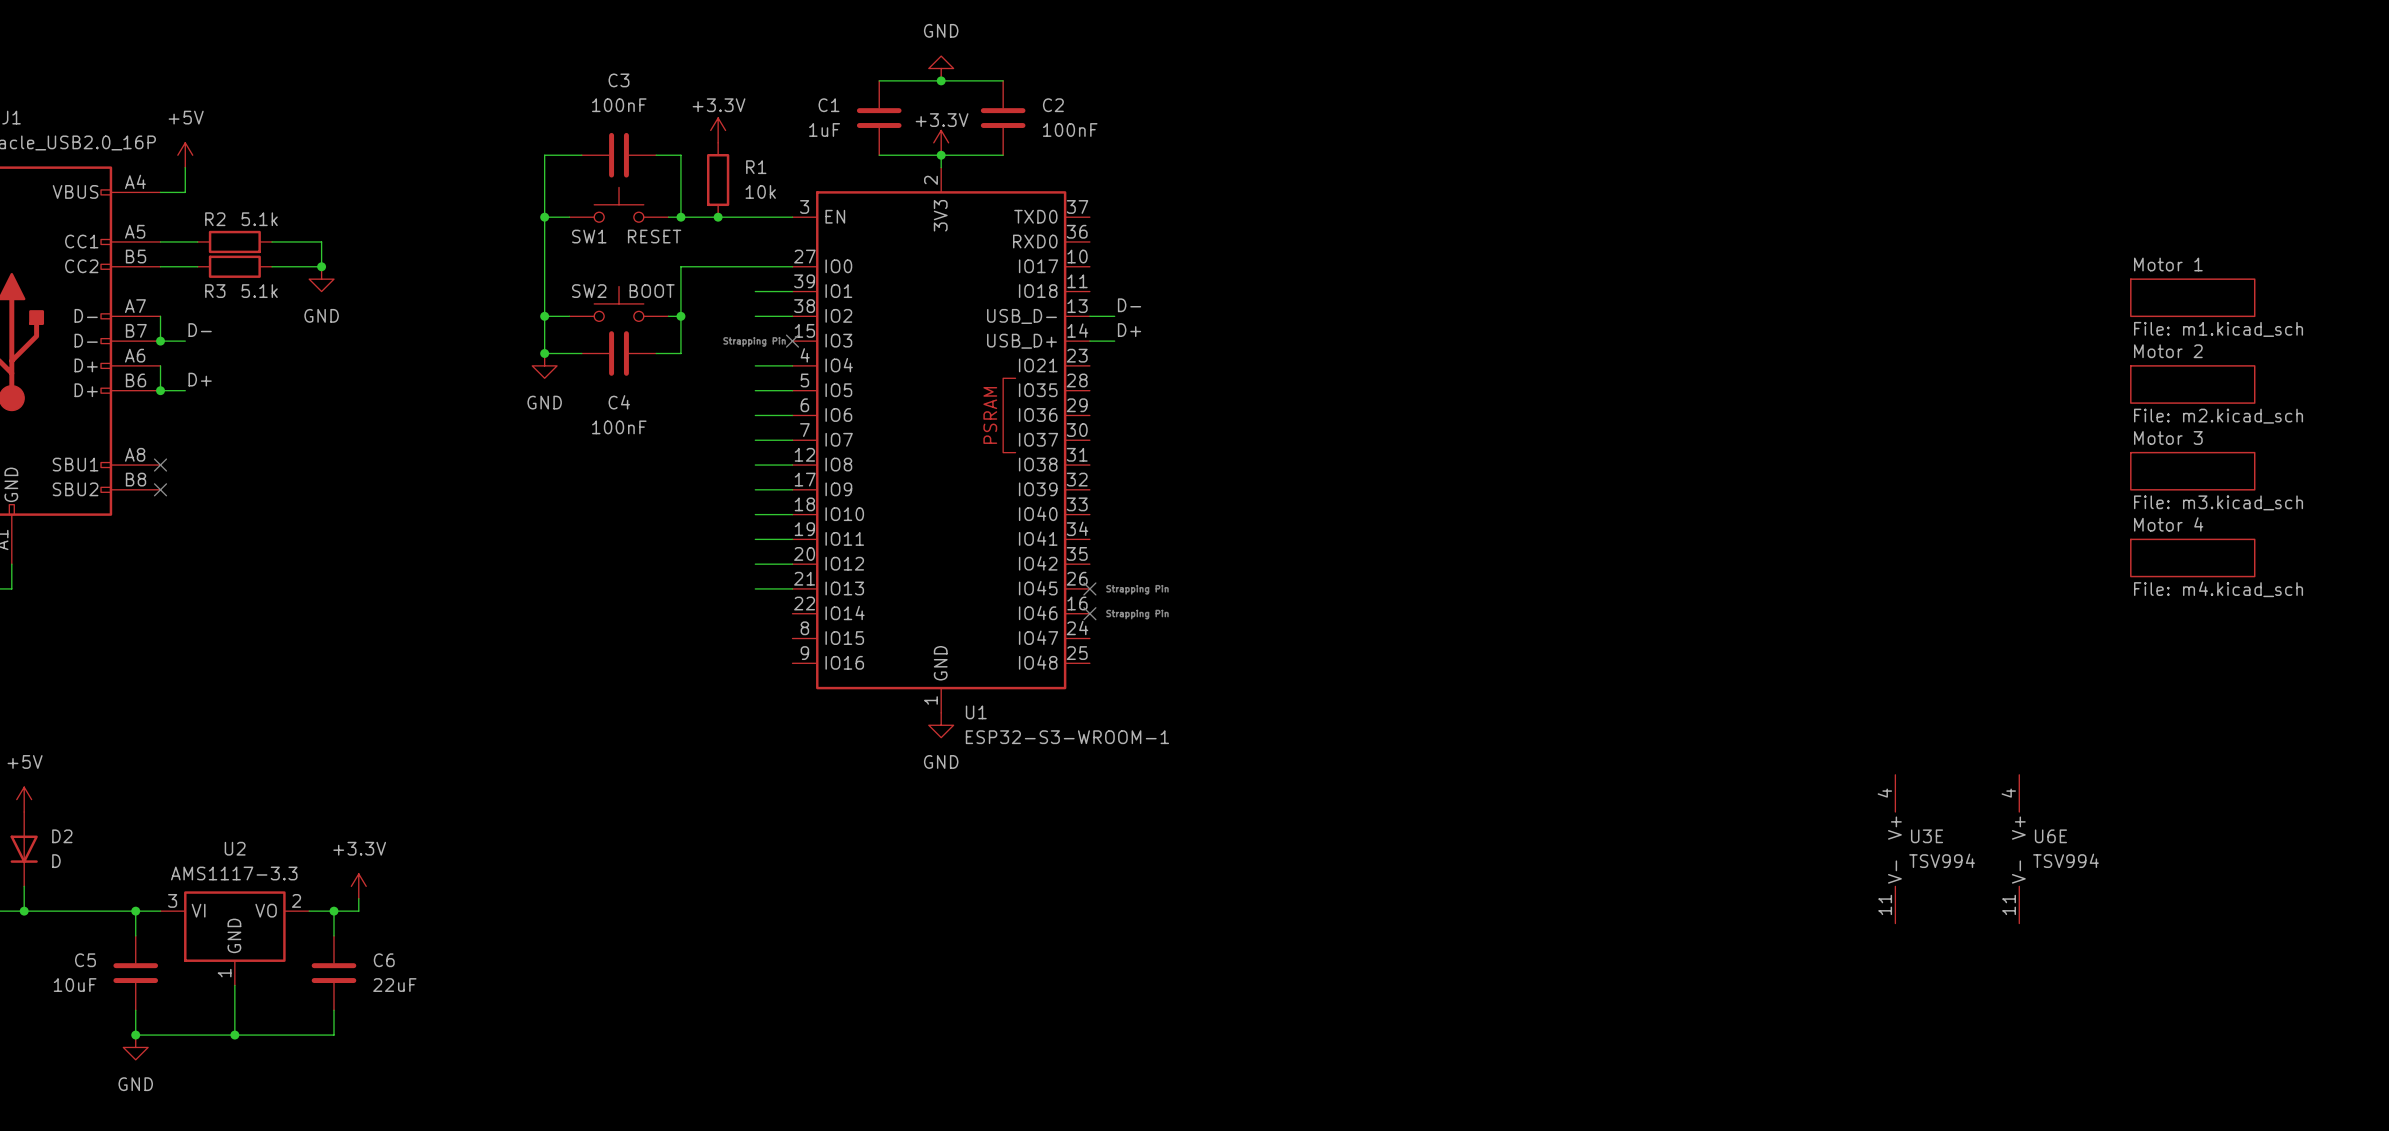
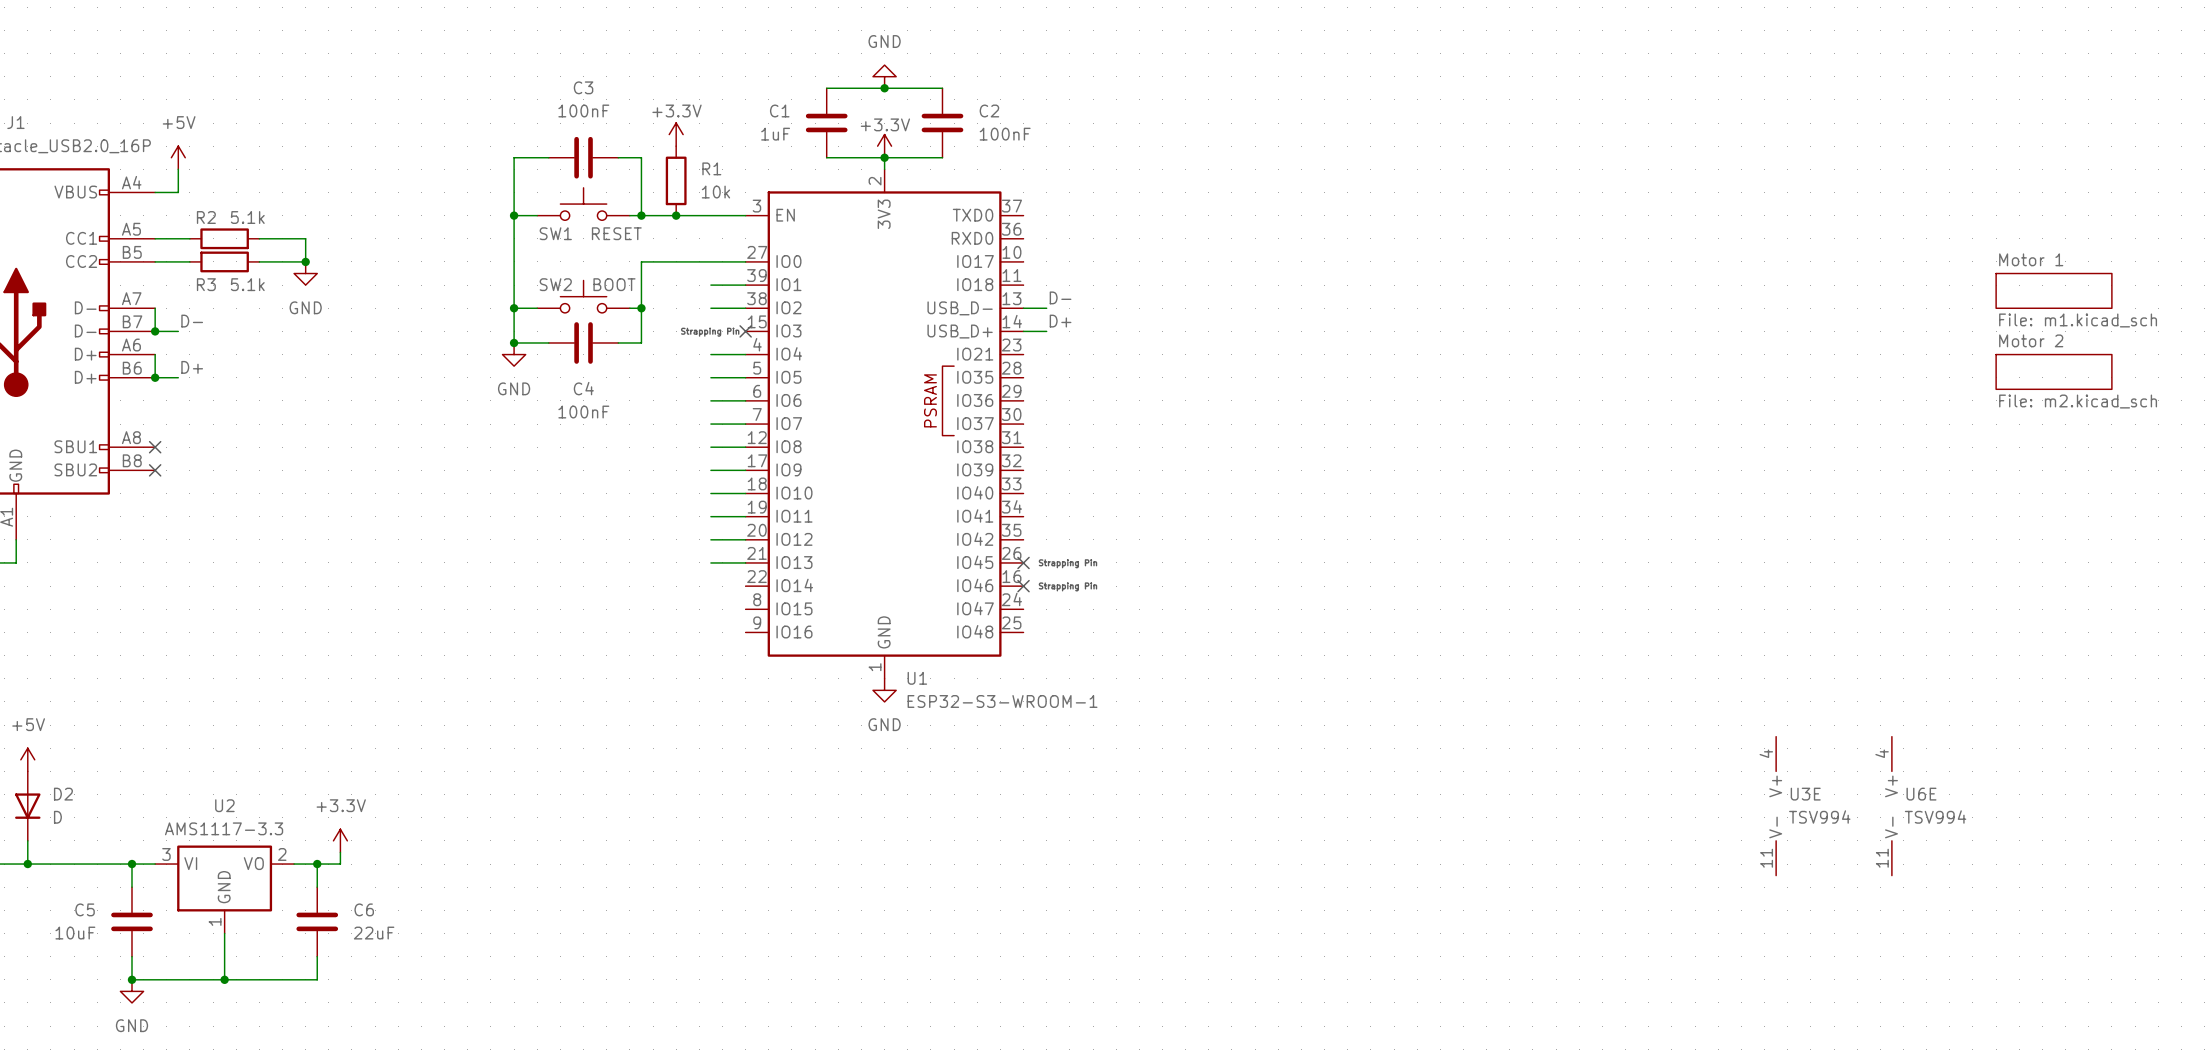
sheet Motor 3: File: m3.kicad_sch (2192, 471) -> none
sheet Motor 4: File: m4.kicad_sch (2192, 557) -> none

